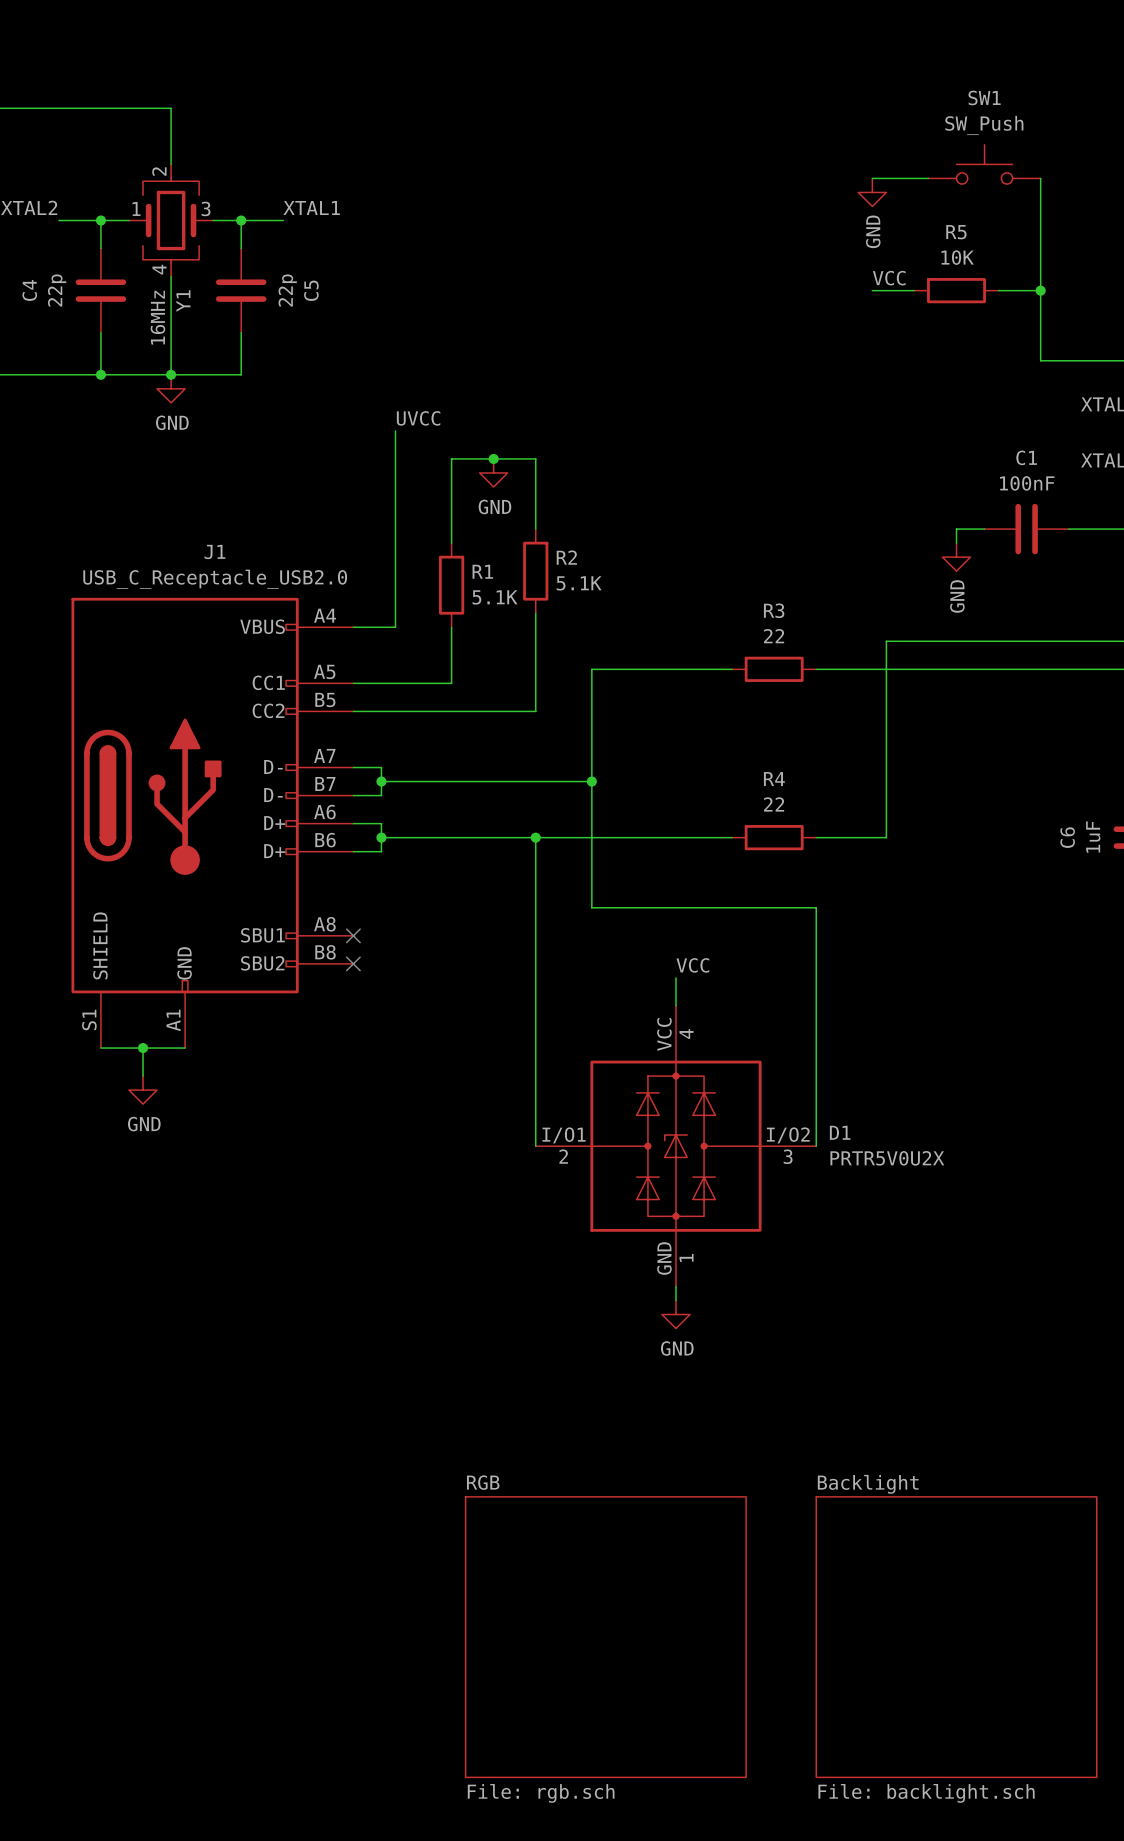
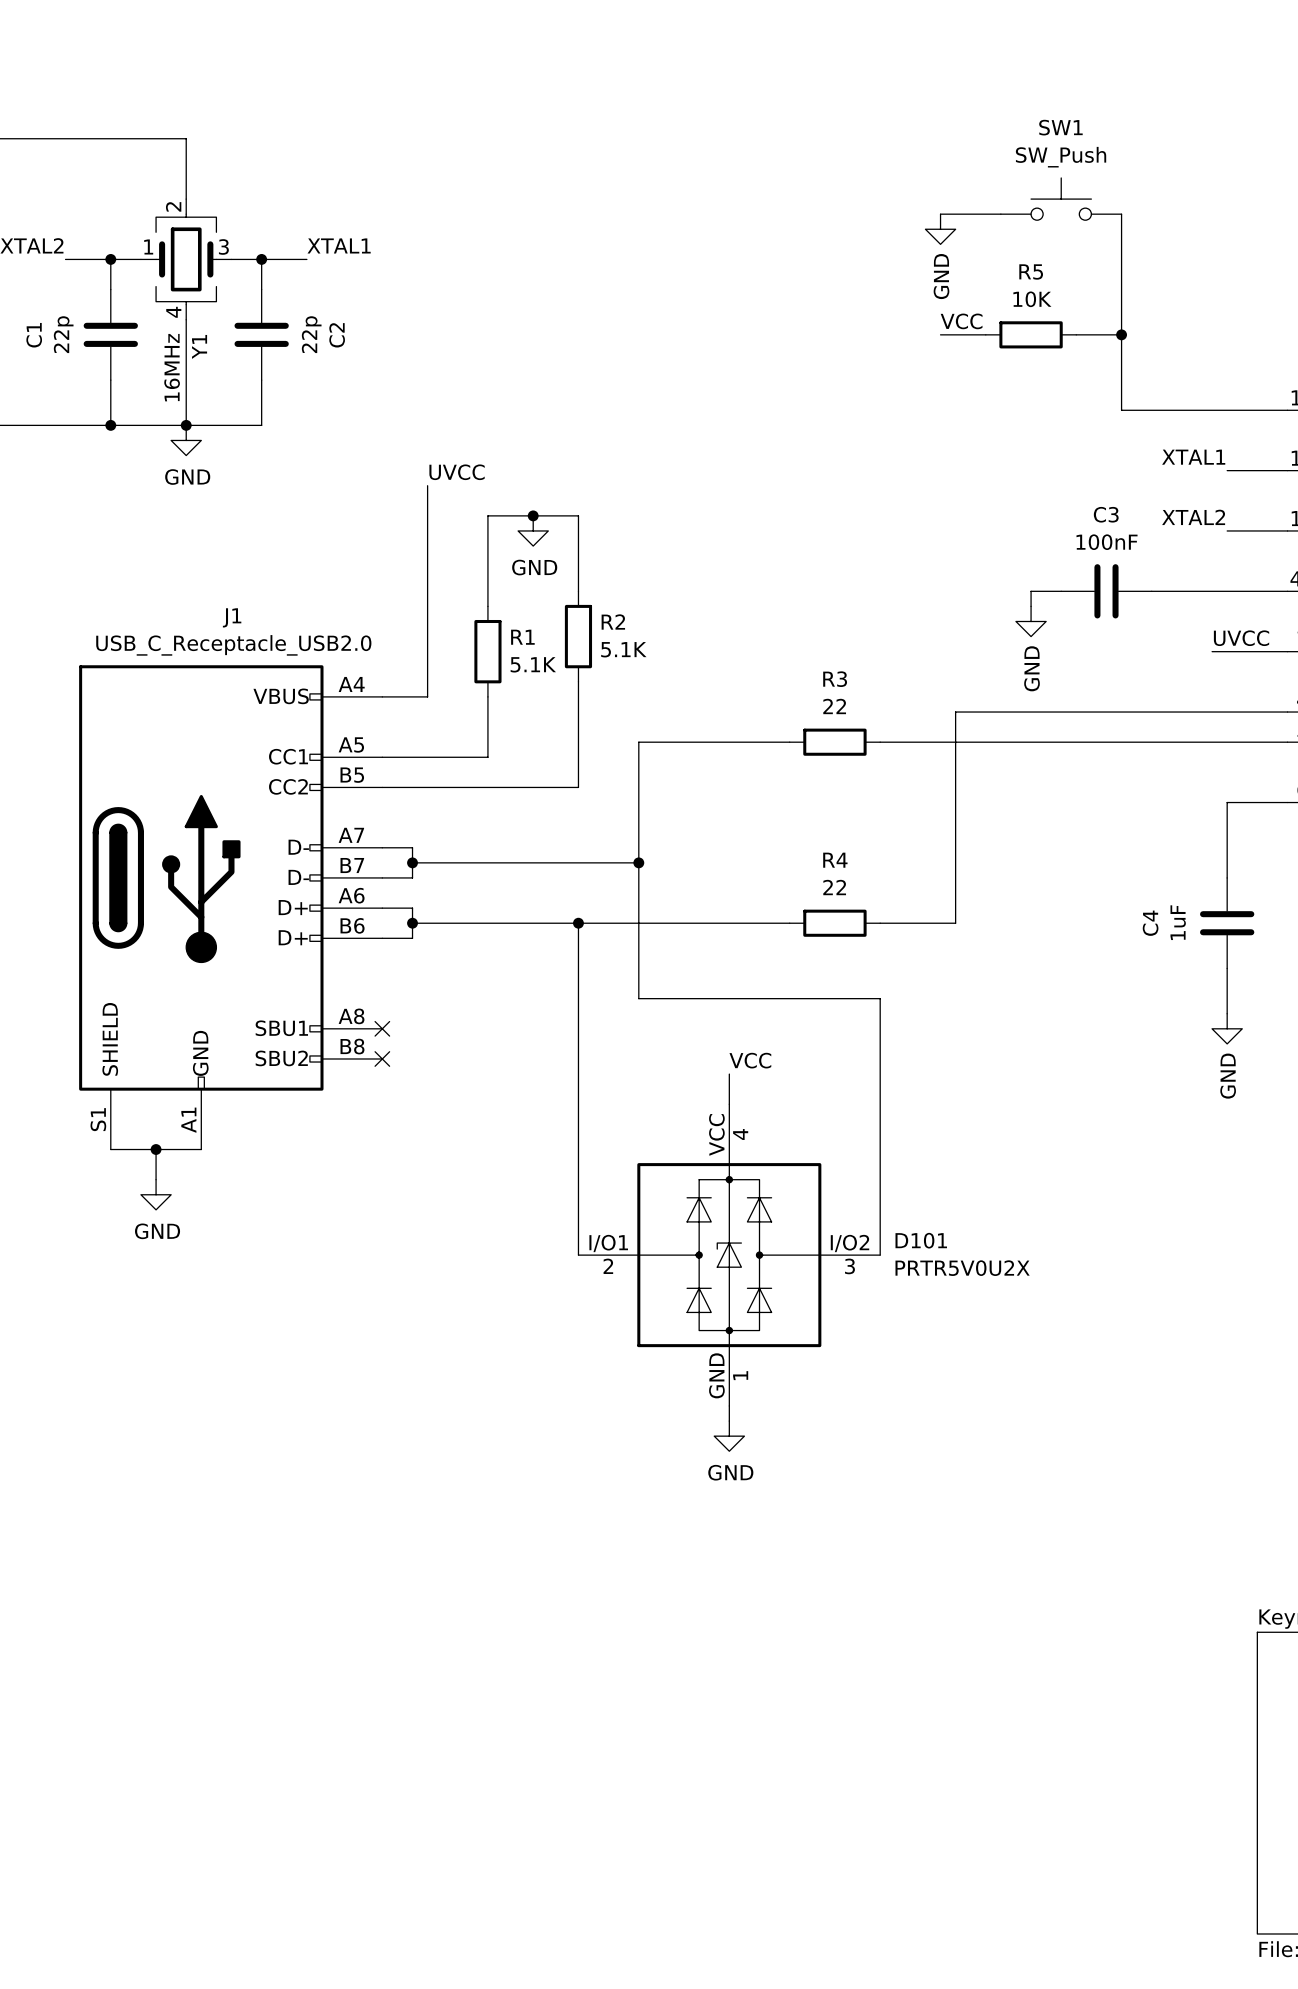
C4 name: C4 (29, 290) -> C1 (34, 335)
C5 name: C5 (311, 290) -> C2 (337, 335)
C1 name: C1 (1026, 457) -> C3 (1106, 514)
C6 name: C6 (1067, 837) -> C4 (1150, 923)
D1 name: D1 (840, 1132) -> D101 (921, 1240)
sheet RGB: File: rgb.sch (605, 1637) -> none
sheet Backlight: File: backlight.sch (956, 1637) -> none

